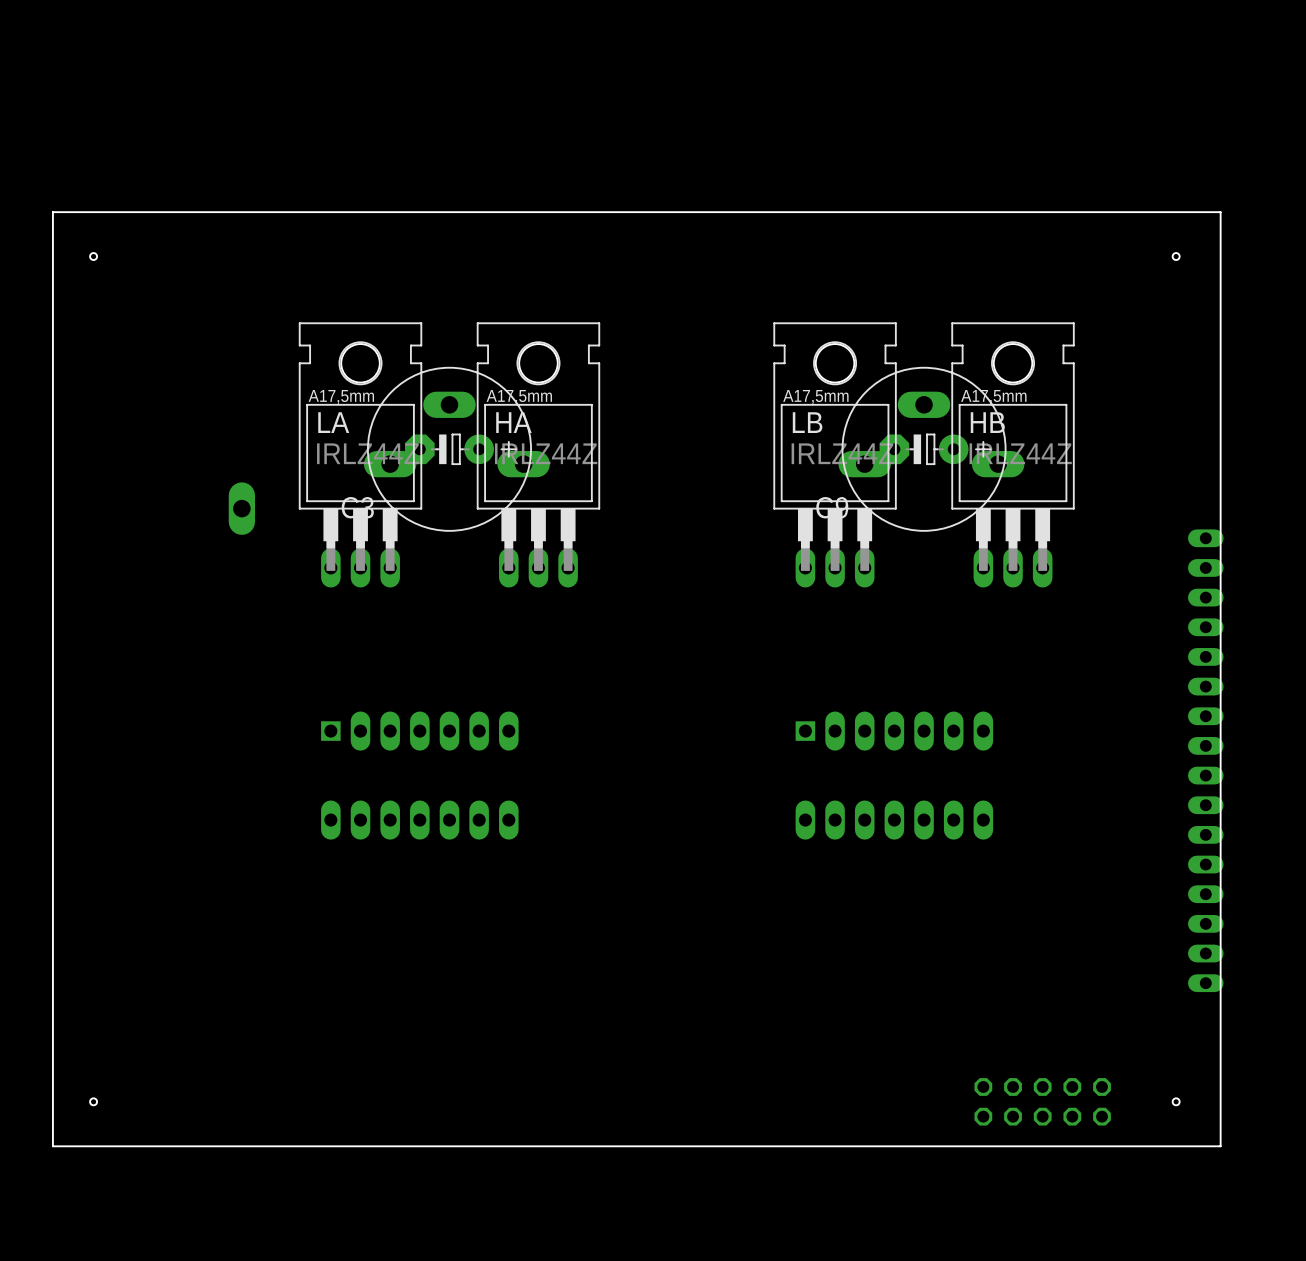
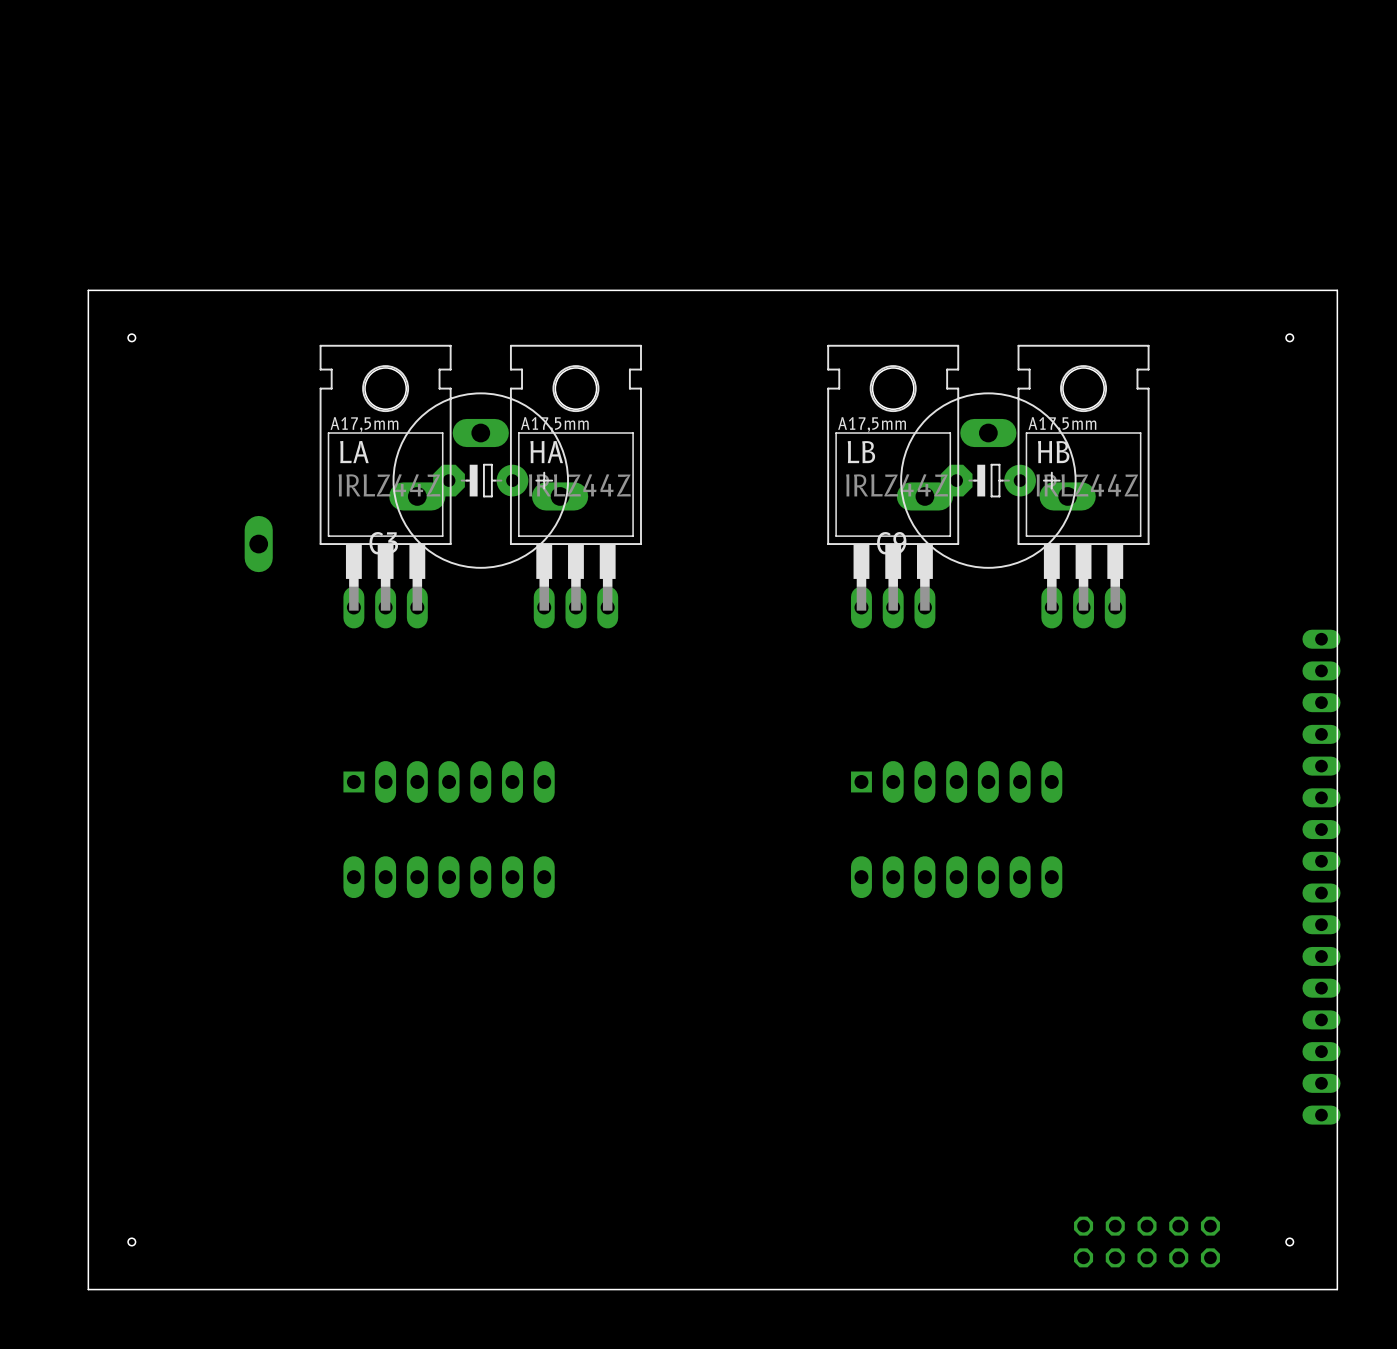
board edge: (1220, 212) (52, 212) (52, 1146) (1220, 1146) (1220, 212) -> (1337, 290) (1337, 1289) (88, 1289) (88, 290) (1337, 290)
hole position: (93, 256) -> (131, 337)
hole position: (1176, 256) -> (1289, 337)
part position: (1205, 760) -> (1321, 877)
hole position: (93, 1101) -> (131, 1241)
part position: (1042, 1101) -> (1147, 1241)
hole position: (1176, 1101) -> (1289, 1241)

